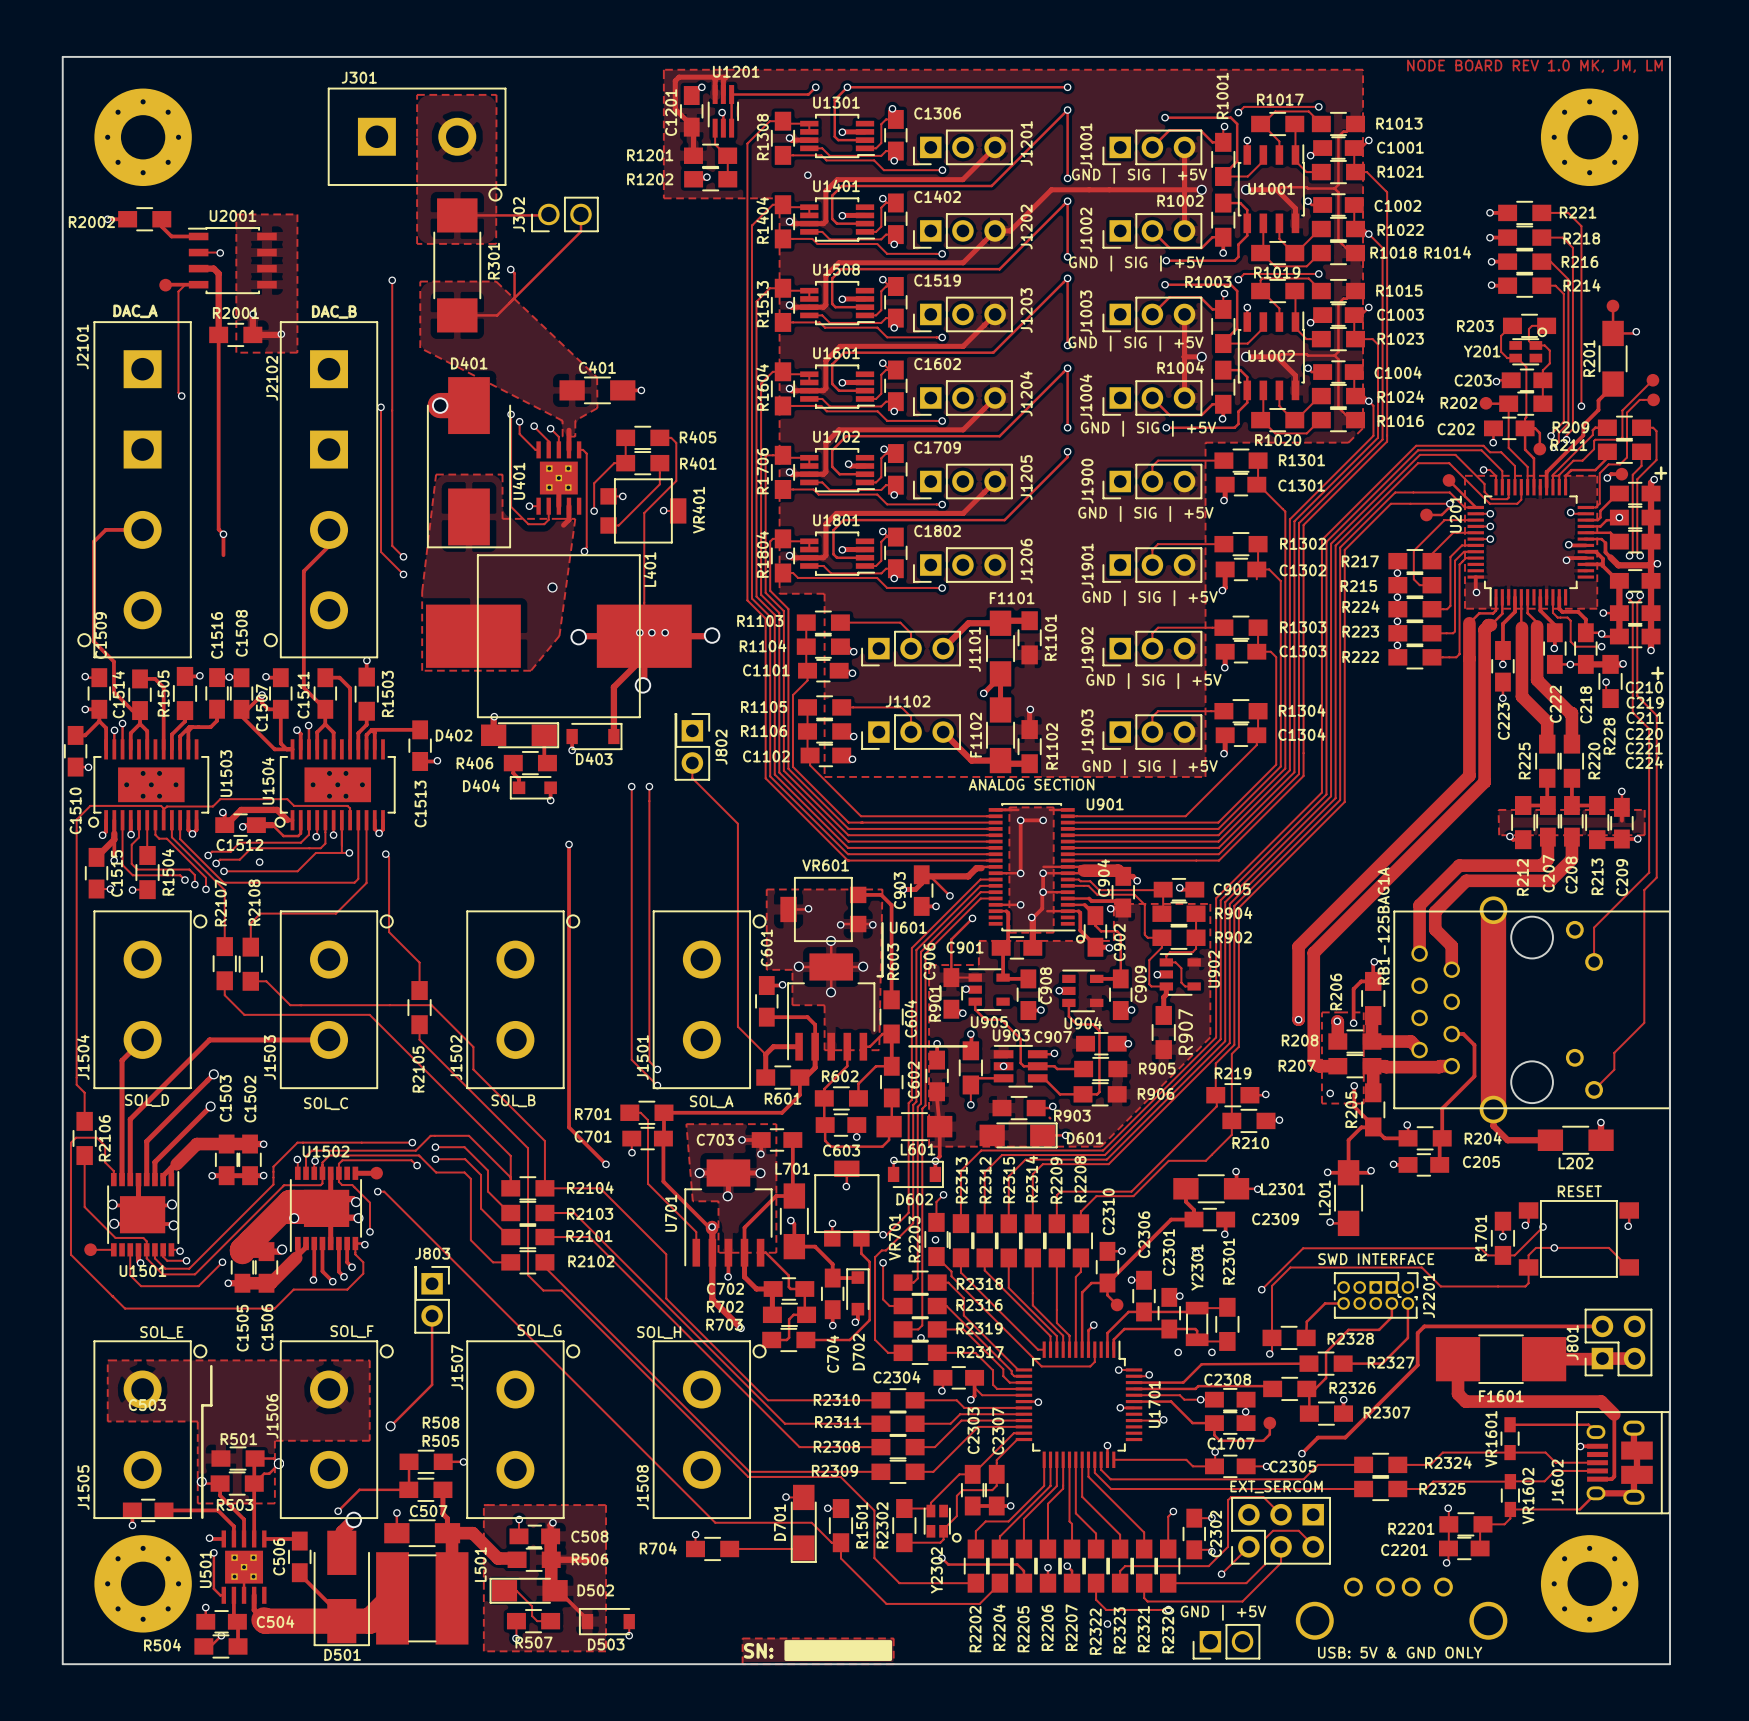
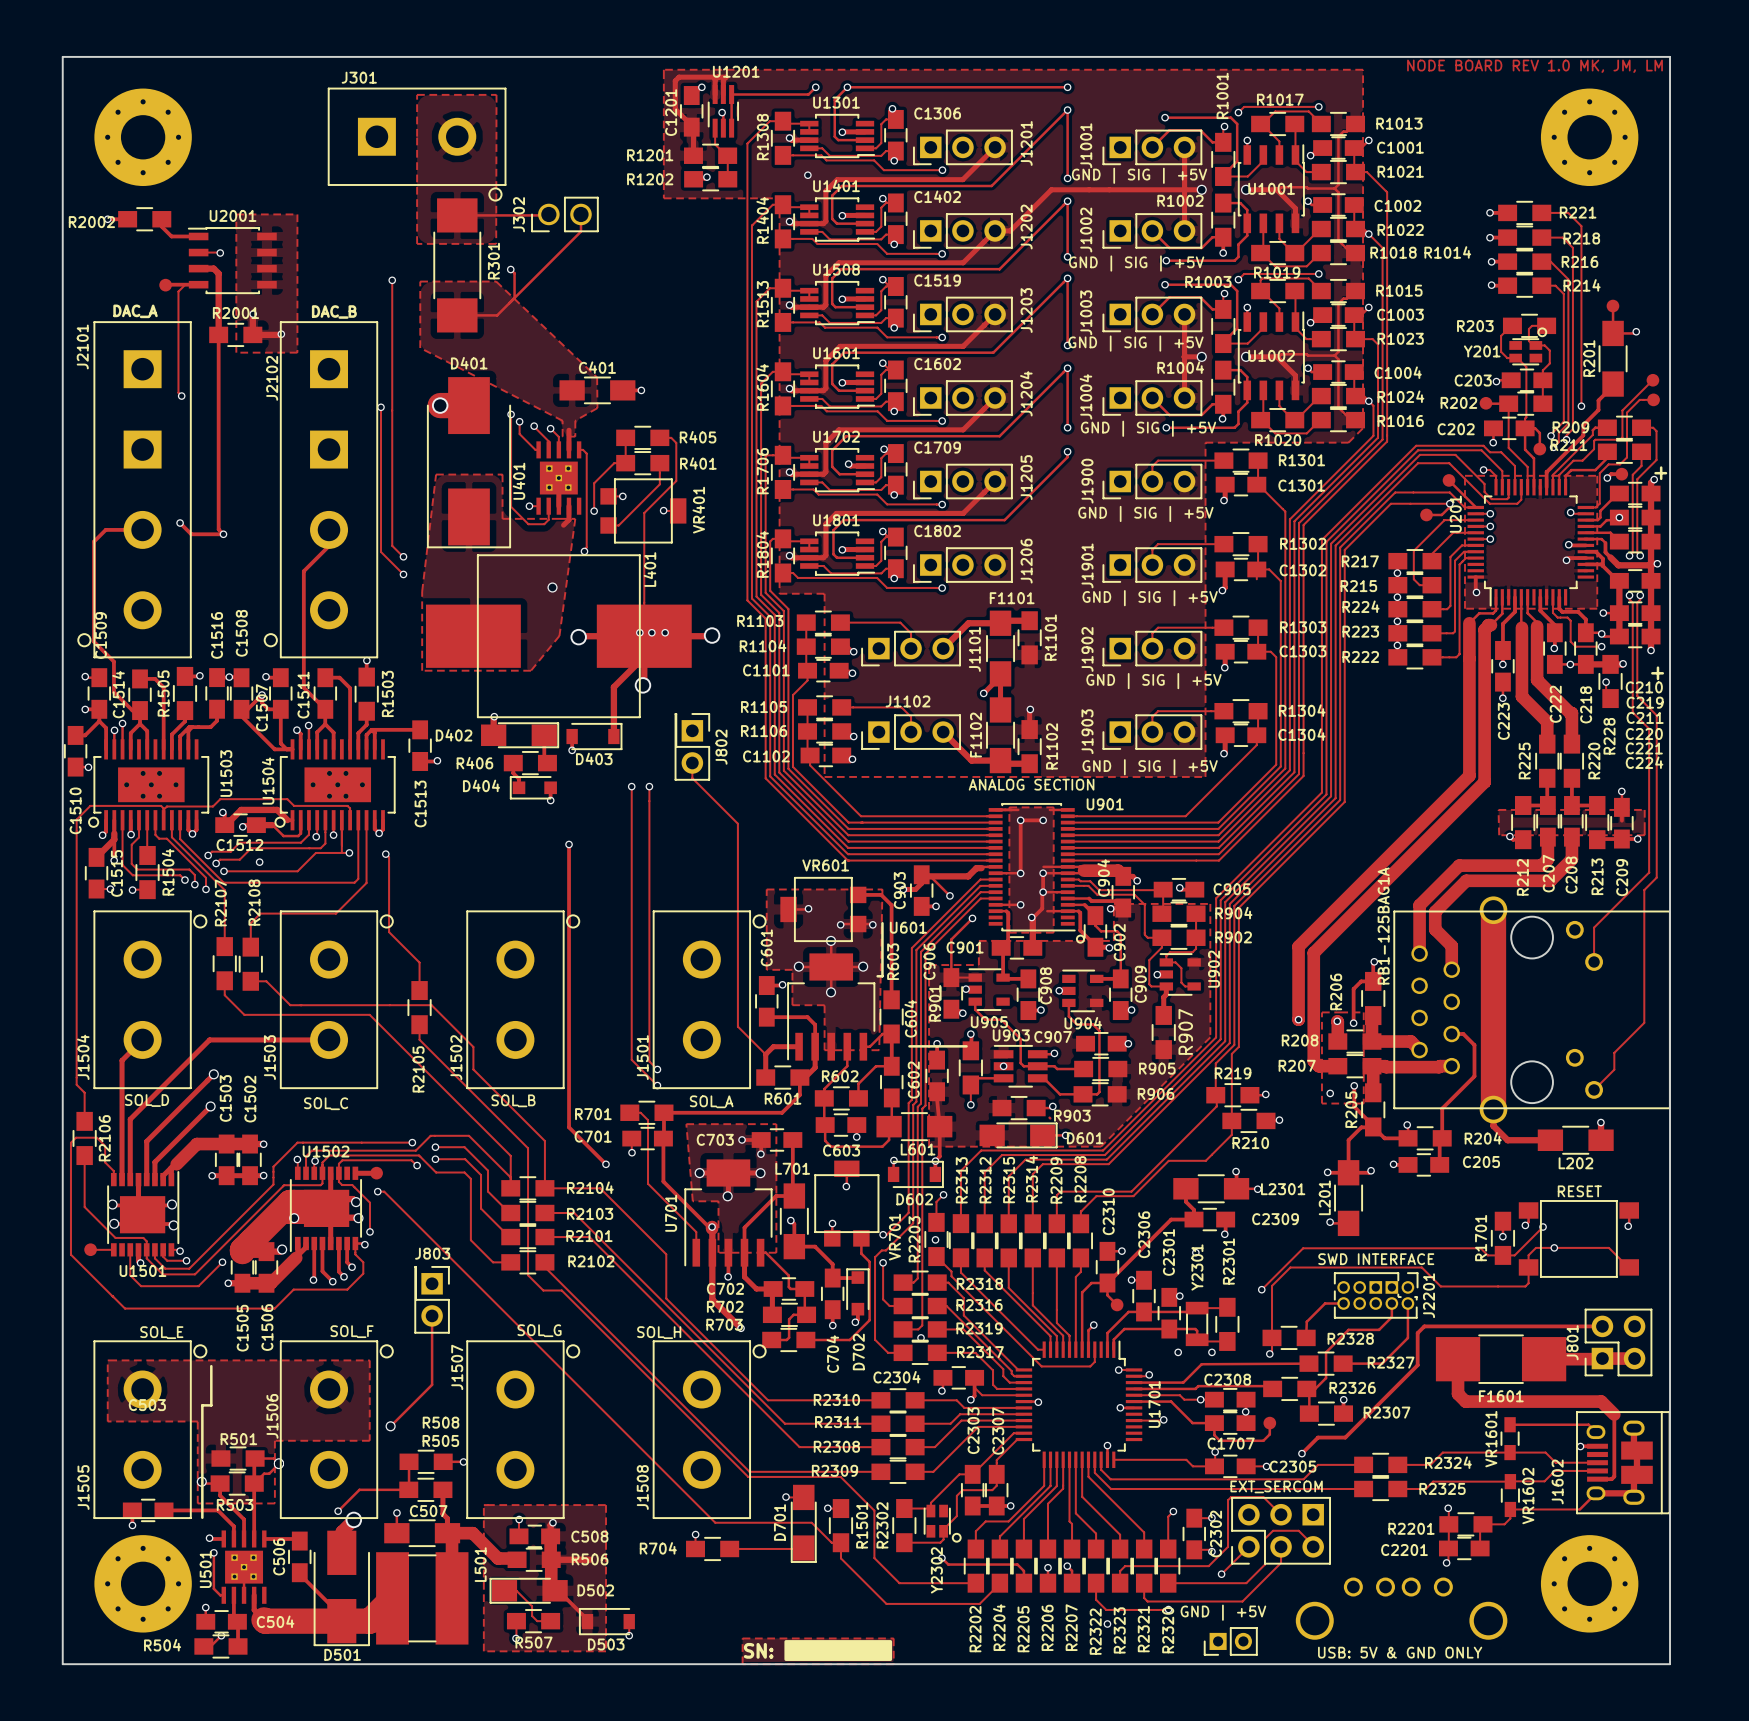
via: none -> (180, 523)
track: (223, 534) (223, 555) -> (223, 534) (191, 534) (180, 523)
part footprint: [1192, 1624, 1261, 1660] -> [1203, 1627, 1258, 1656]

